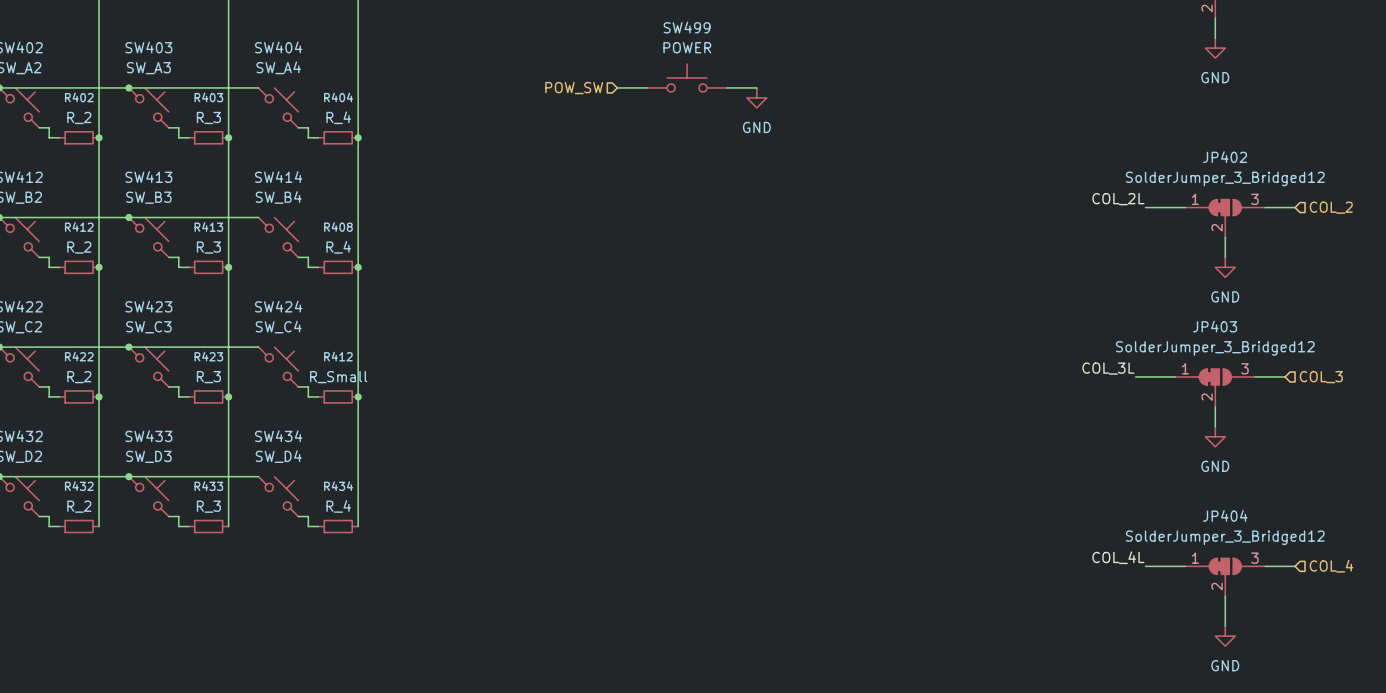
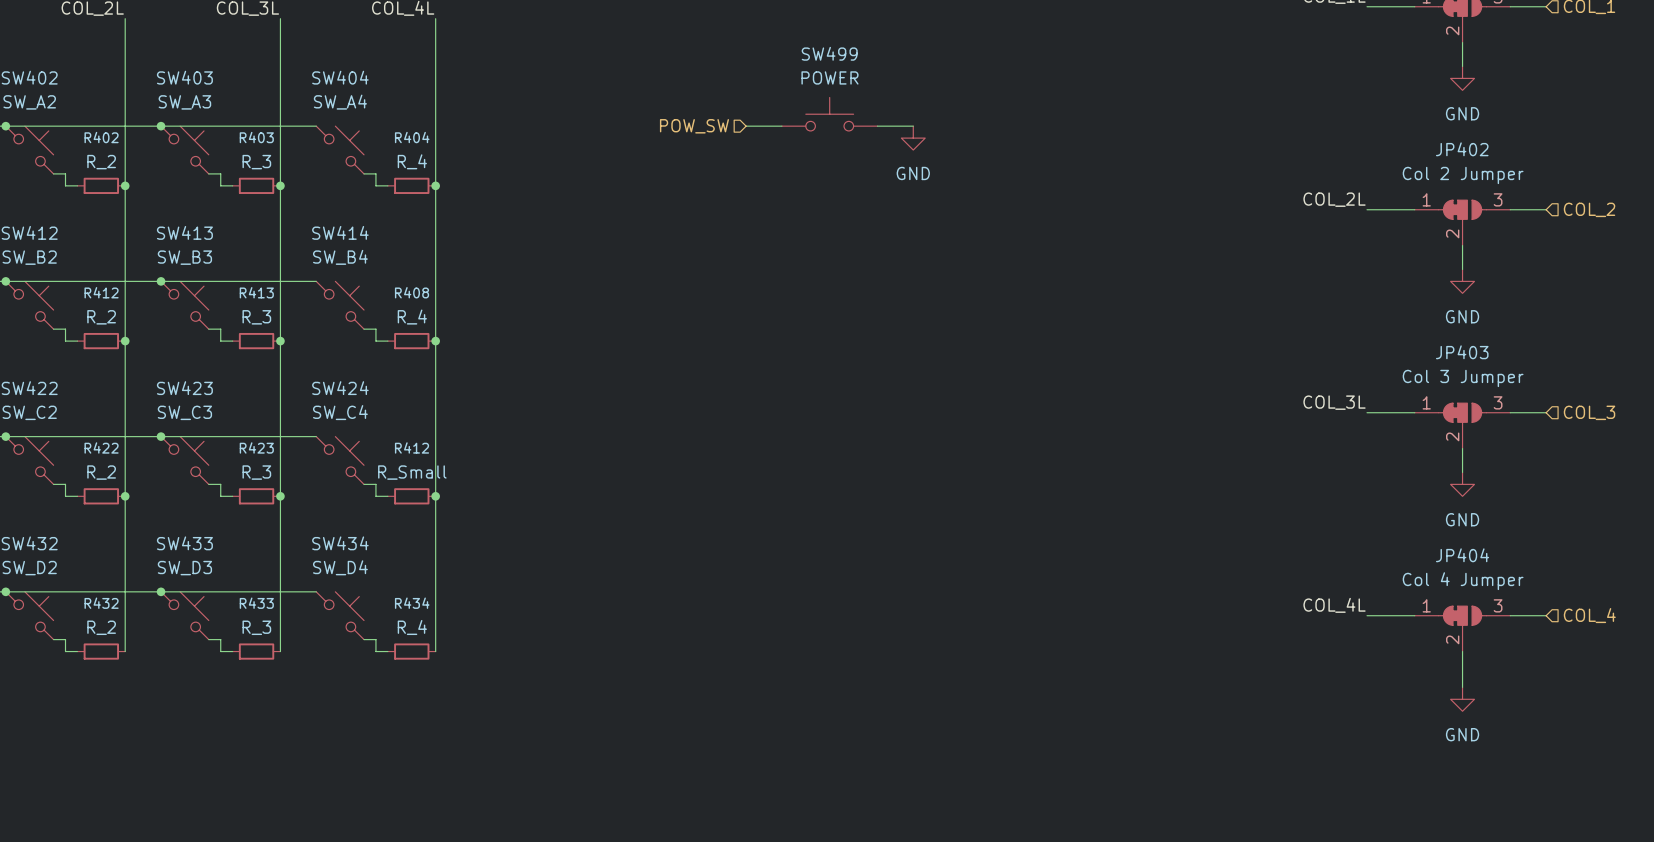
JP402 value: SolderJumper_3_Bridged12 (1225, 178) -> Col 2 Jumper (1463, 175)
label position: COL_2L (1118, 199) -> COL_2L (1334, 199)
wire: (1145, 207) (1185, 207) -> (1367, 209) (1414, 209)
wire: (1265, 207) (1295, 207) -> (1510, 209) (1546, 209)
hierarchical label position: COL_2 (1331, 207) -> COL_2 (1589, 209)
JP402 position: (1225, 218) -> (1462, 222)
wire: (1225, 237) (1225, 257) -> (1462, 245) (1462, 269)
power symbol position: GND (1225, 267) -> GND (1462, 281)
JP403 value: SolderJumper_3_Bridged12 (1215, 348) -> Col 3 Jumper (1463, 378)
label position: COL_3L (1108, 368) -> COL_3L (1334, 402)
wire: (1135, 377) (1175, 377) -> (1367, 412) (1414, 412)
wire: (1255, 377) (1285, 377) -> (1510, 412) (1546, 412)
hierarchical label position: COL_3 (1321, 377) -> COL_3 (1589, 412)
JP403 position: (1215, 387) -> (1462, 425)
wire: (1215, 406) (1215, 426) -> (1462, 448) (1462, 472)
power symbol position: GND (1215, 436) -> GND (1462, 484)
JP404 value: SolderJumper_3_Bridged12 (1225, 537) -> Col 4 Jumper (1463, 581)
label position: COL_4L (1118, 557) -> COL_4L (1334, 605)
wire: (1145, 566) (1185, 566) -> (1367, 615) (1414, 615)
power symbol: none -> GND (1462, 699)
wire: (1265, 566) (1295, 566) -> (1510, 615) (1546, 615)
hierarchical label position: COL_4 (1331, 566) -> COL_4 (1589, 615)
JP404 position: (1225, 577) -> (1462, 628)
wire: (1225, 596) (1225, 626) -> (1462, 651) (1462, 687)
power symbol: GND (1225, 636) -> none

